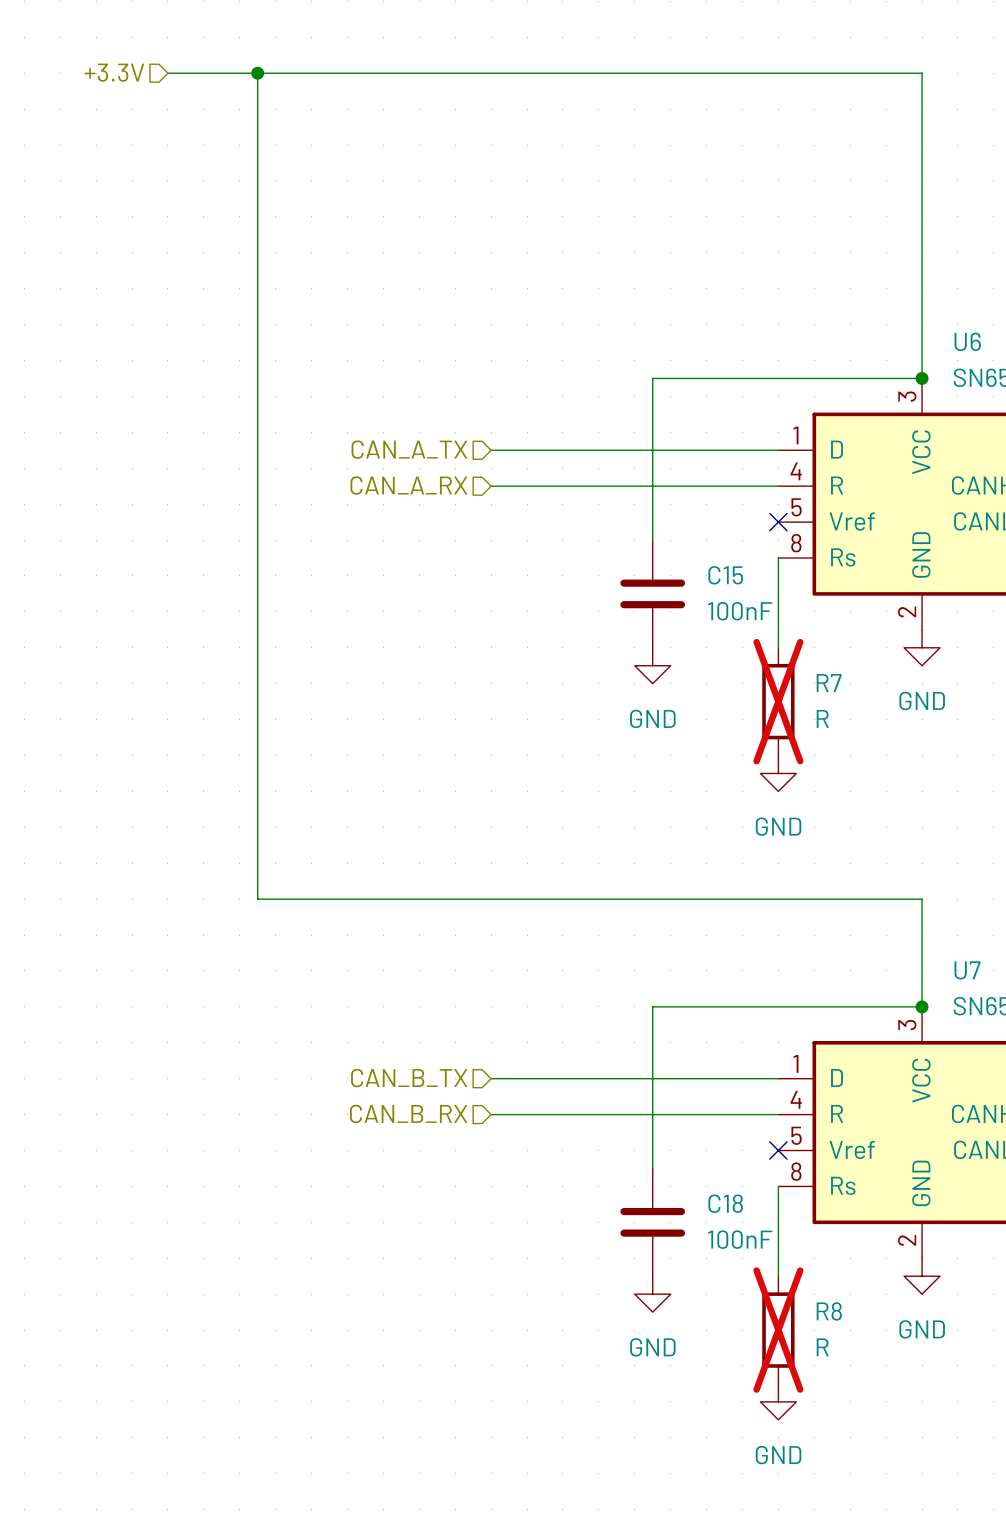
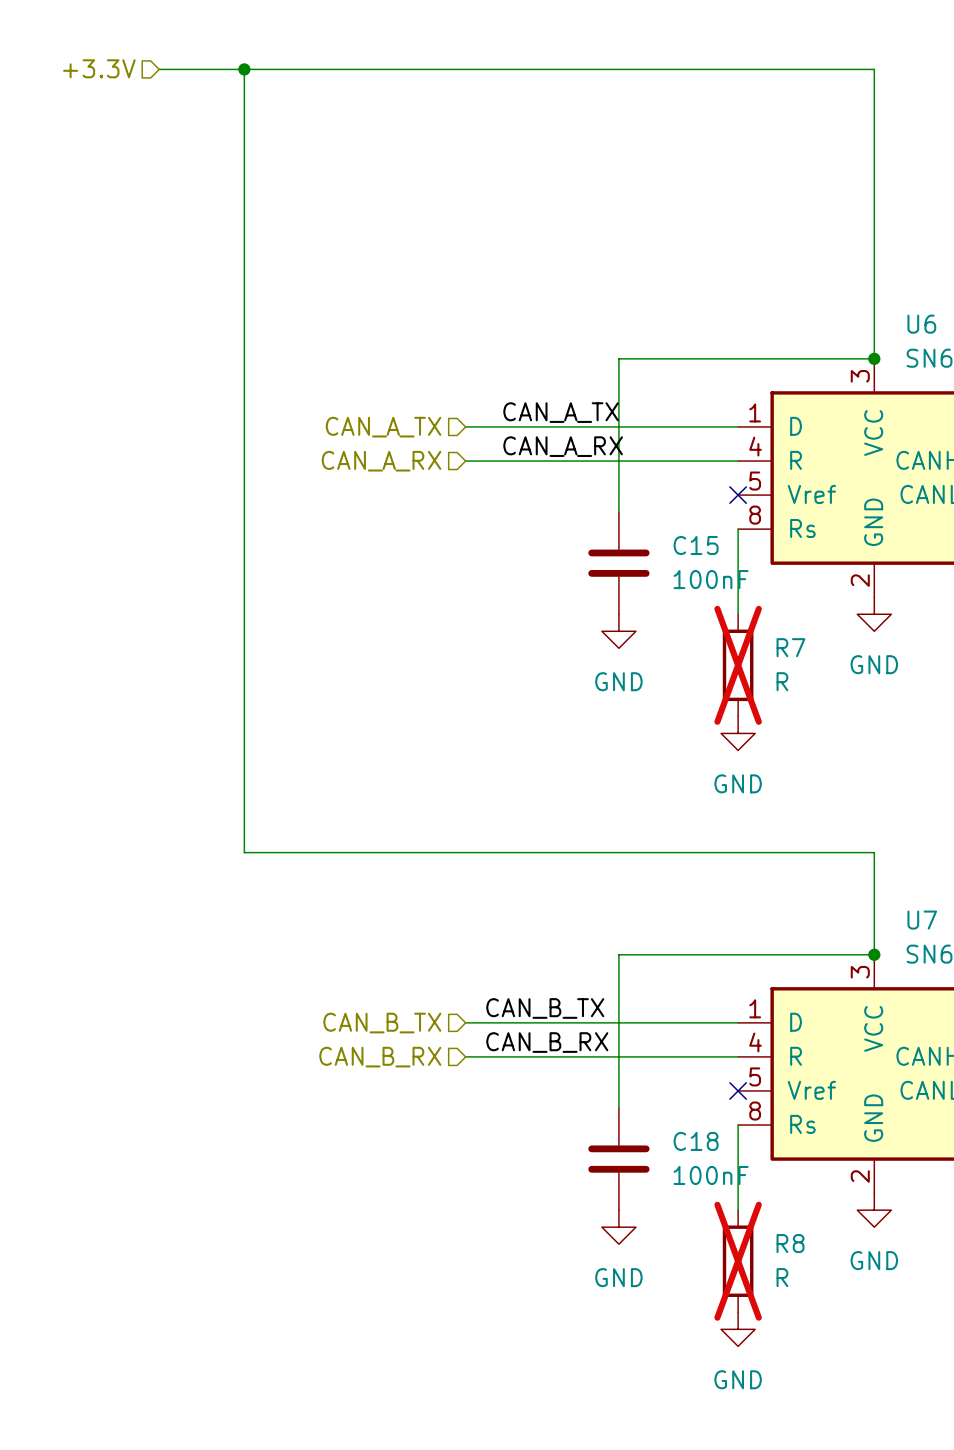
label: none -> CAN_A_TX (561, 412)
label: none -> CAN_A_RX (563, 446)
label: none -> CAN_B_TX (545, 1008)
label: none -> CAN_B_RX (547, 1042)

